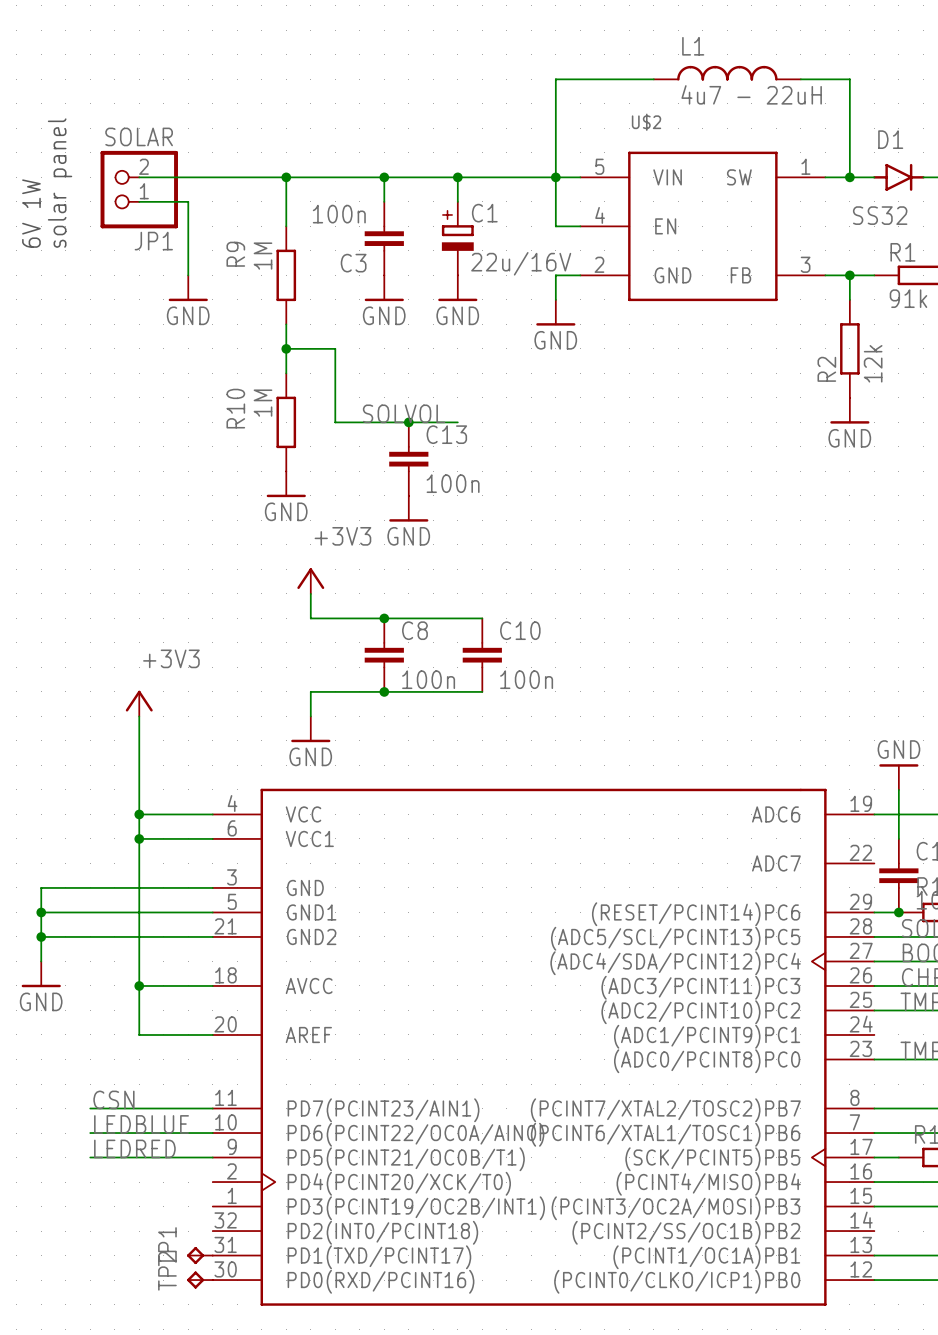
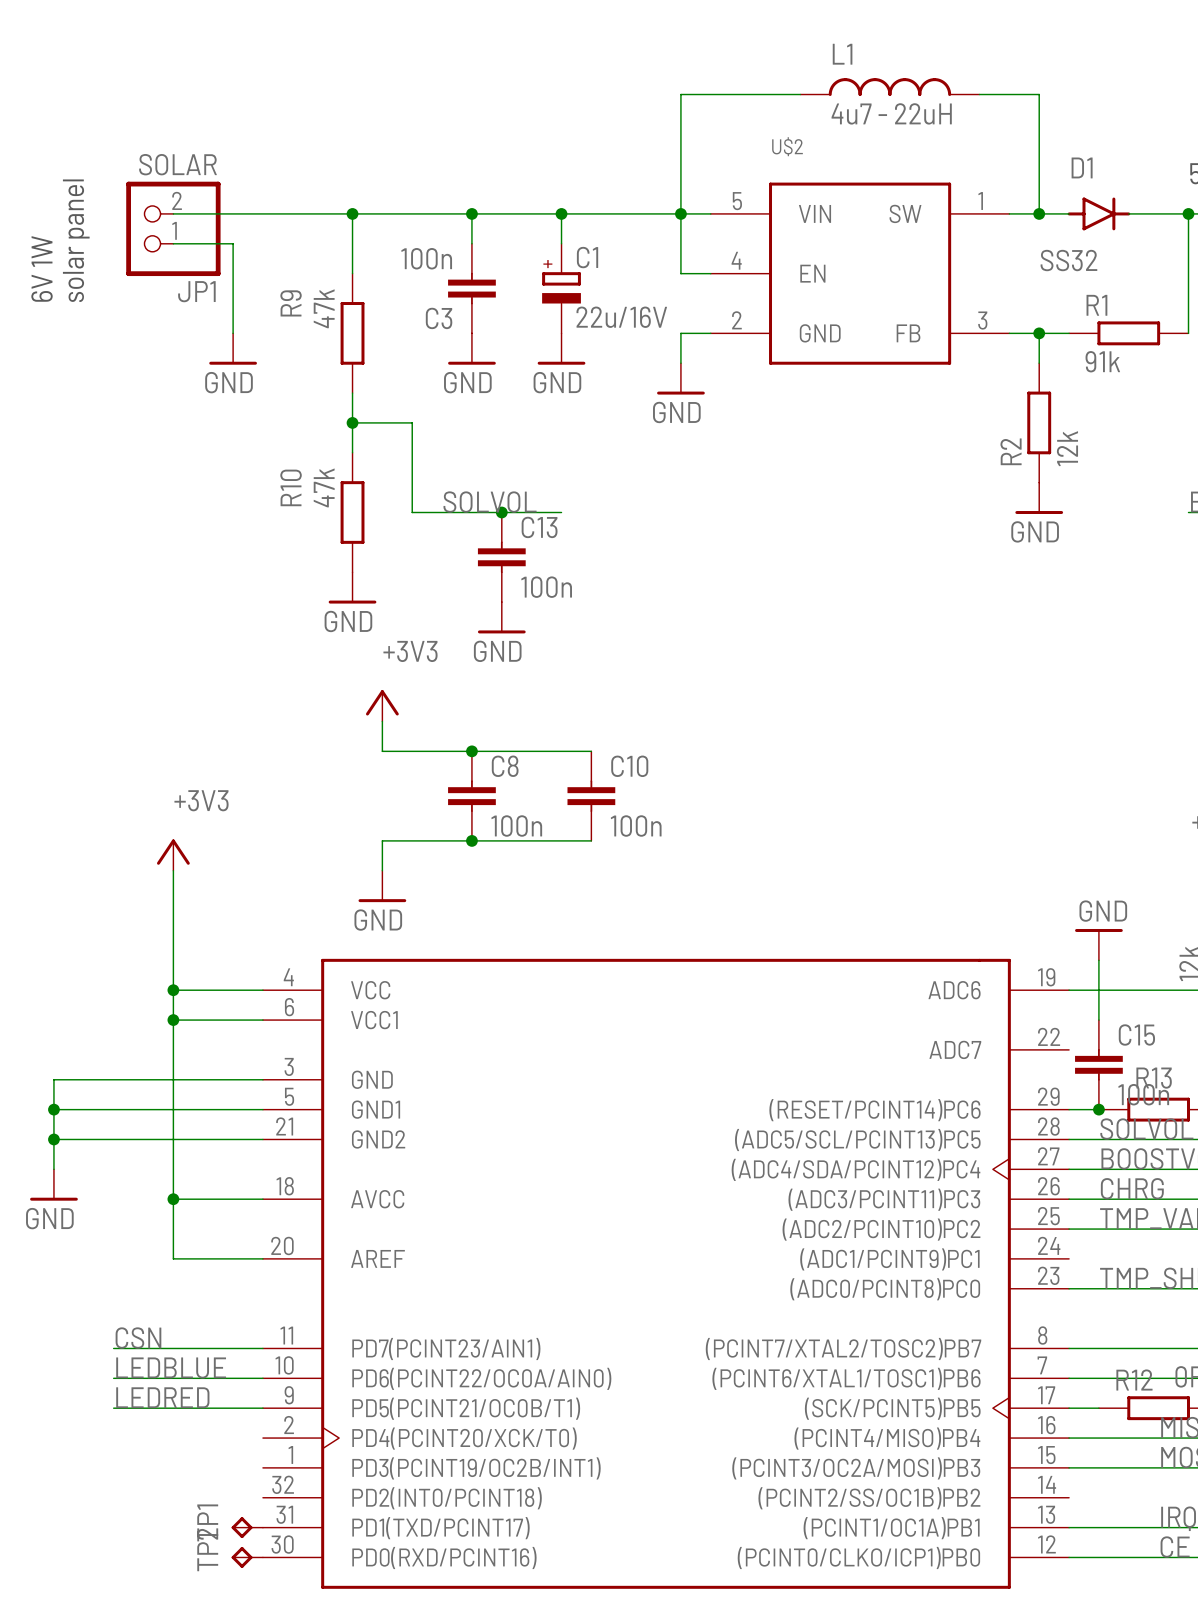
R9 value: 1M (263, 256) -> 47k (324, 308)
R10 value: 1M (263, 403) -> 47k (324, 487)

